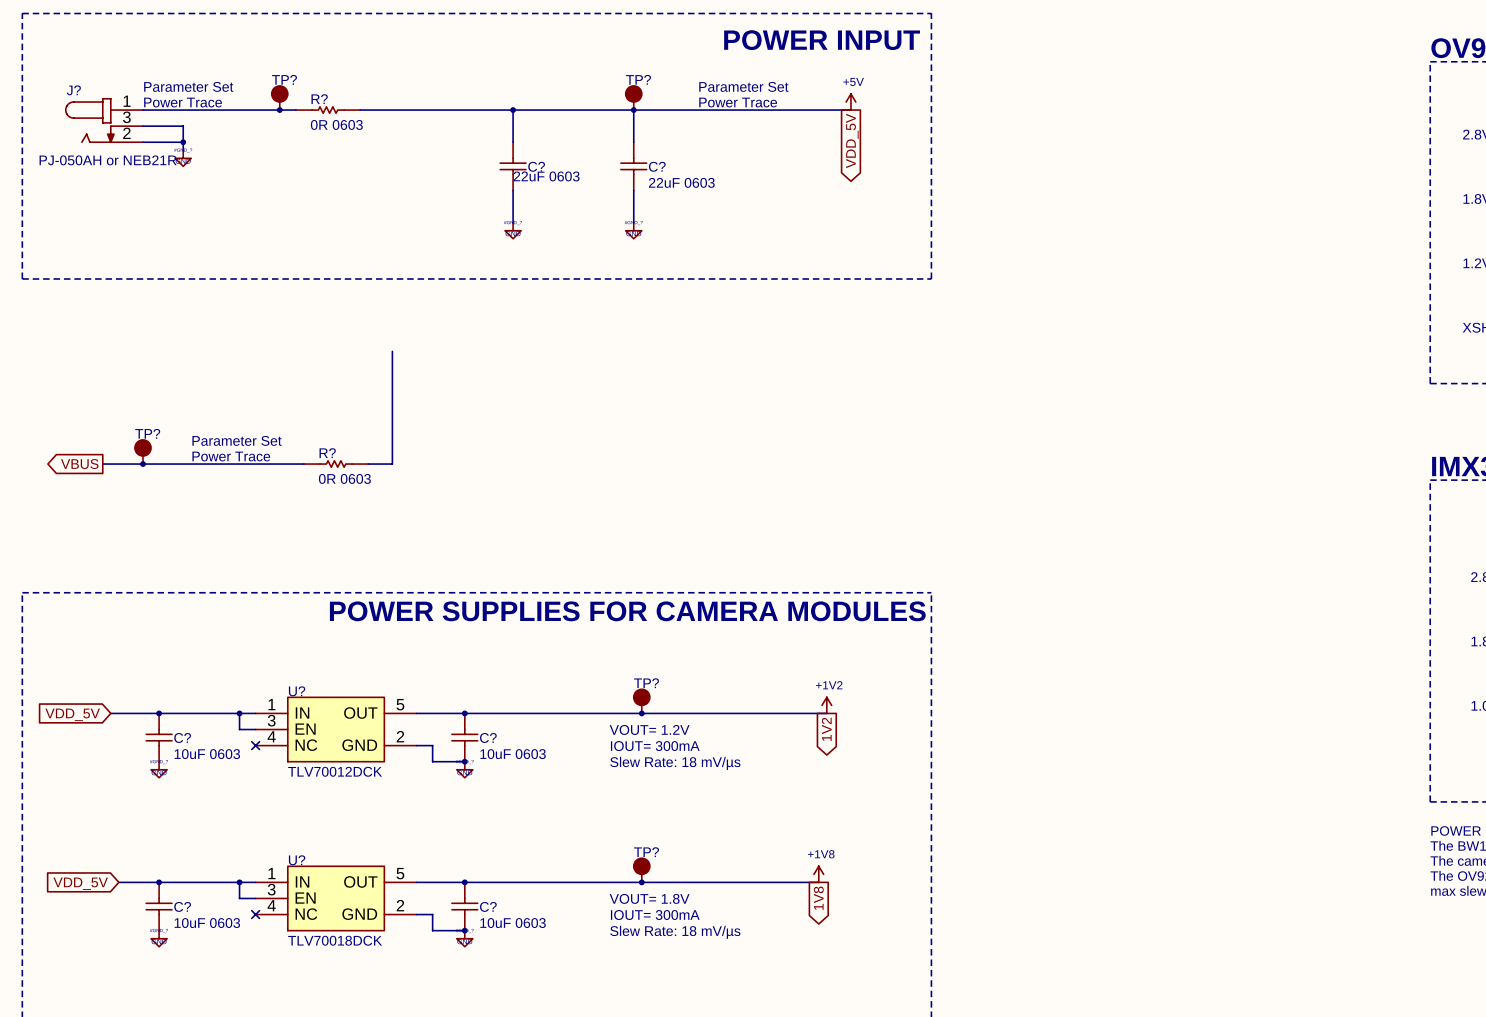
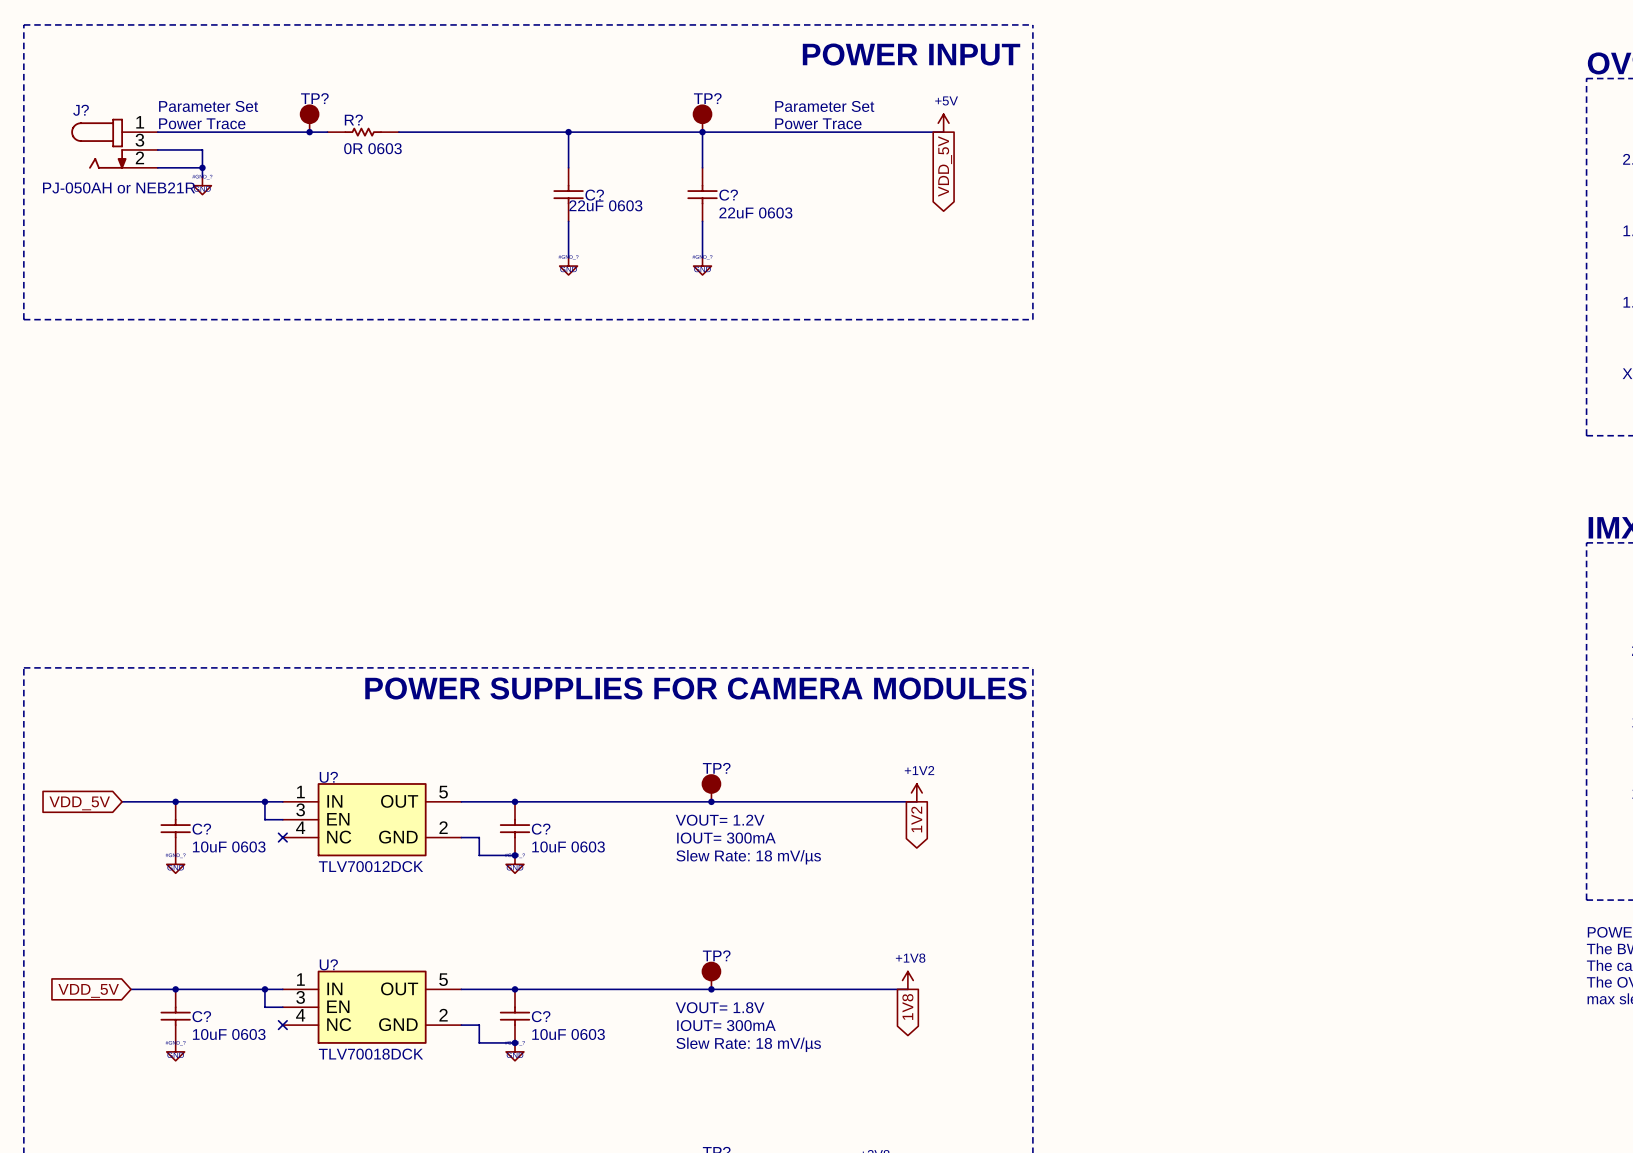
wire: (392, 351) (392, 464) (368, 464) -> none
text: Parameter Set (237, 440) -> none
TP?: (143, 451) -> none
text: Power Trace (231, 456) -> none
global label: VBUS (79, 464) -> none
wire: (102, 464) (303, 464) -> none
junction: (143, 464) -> none
R?: 0R 0603 (336, 464) -> none

